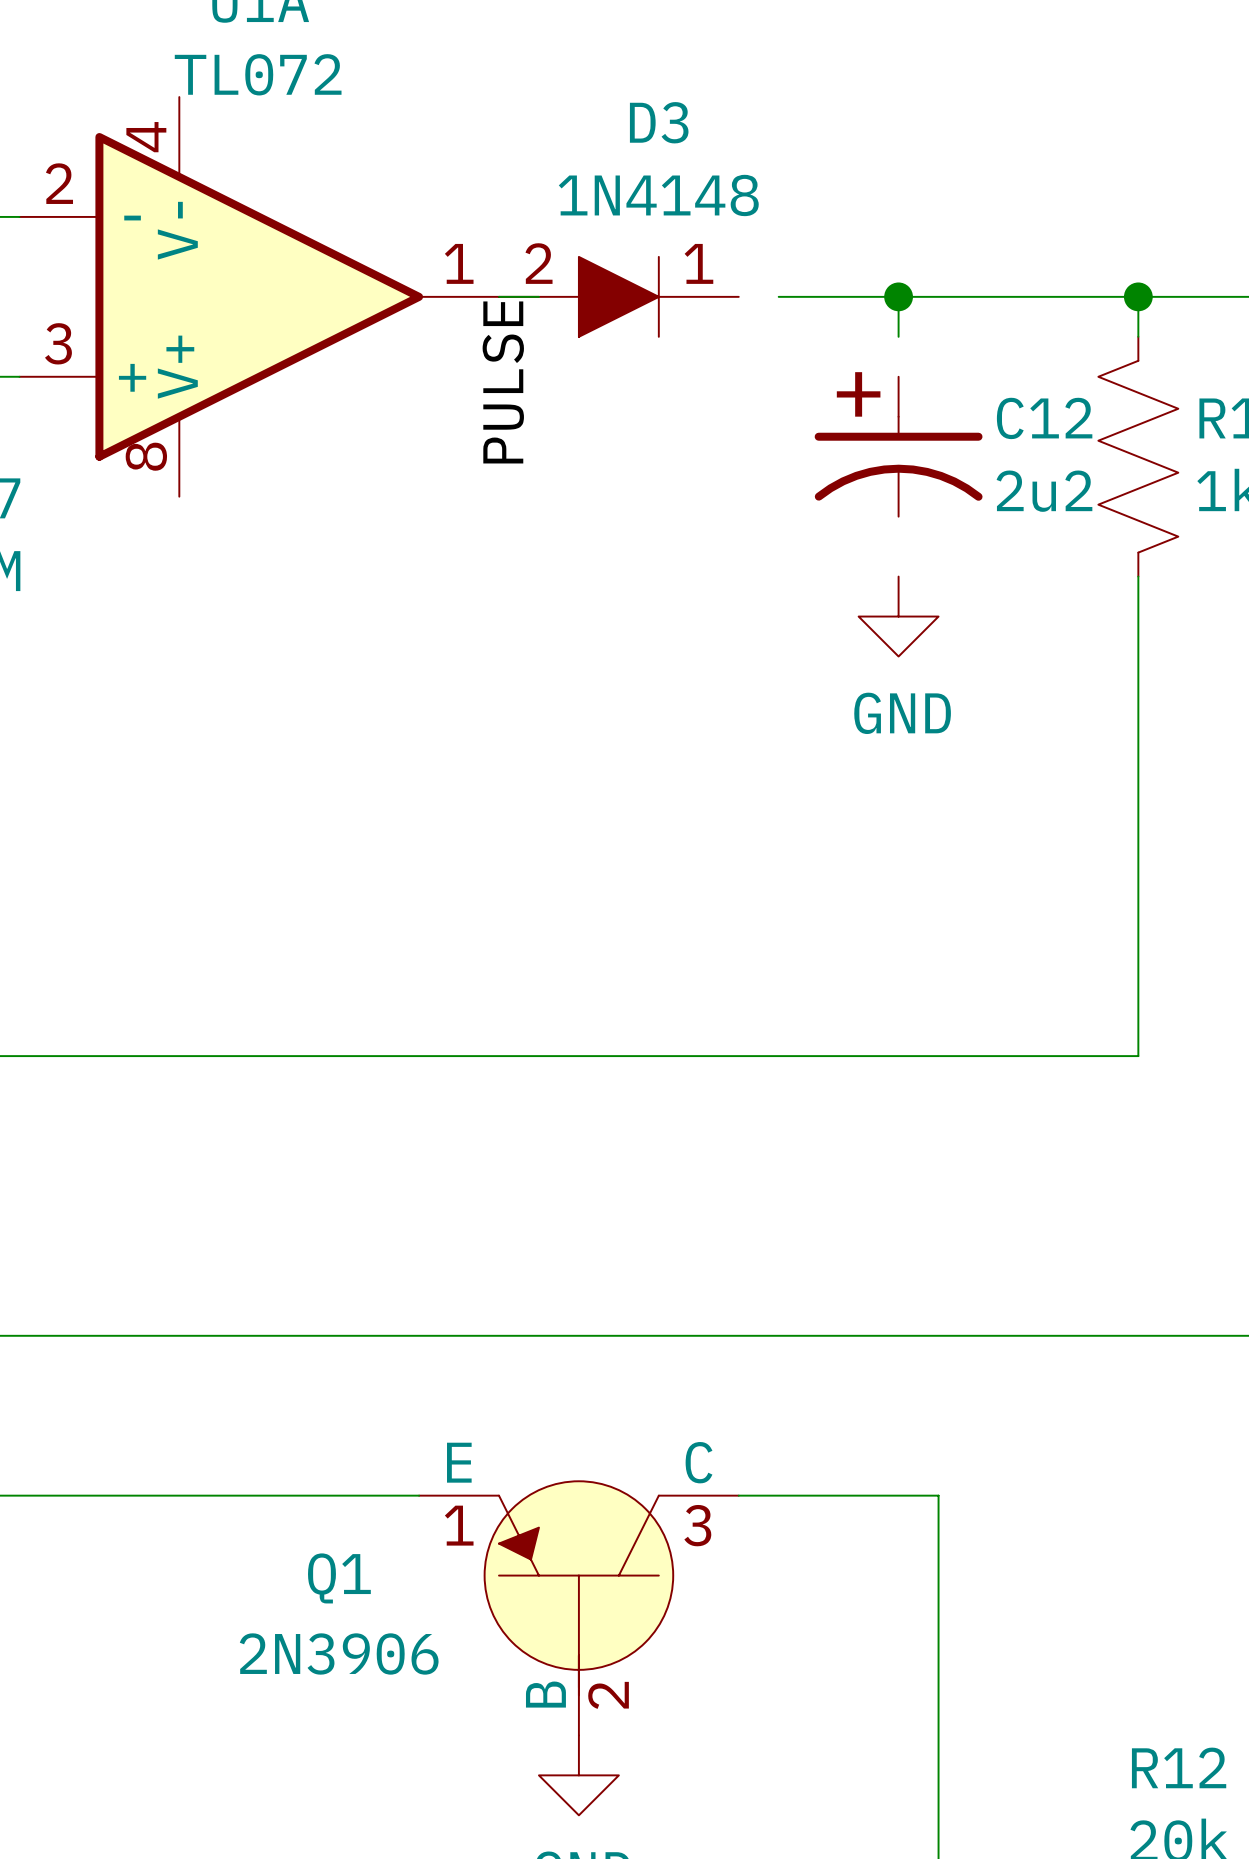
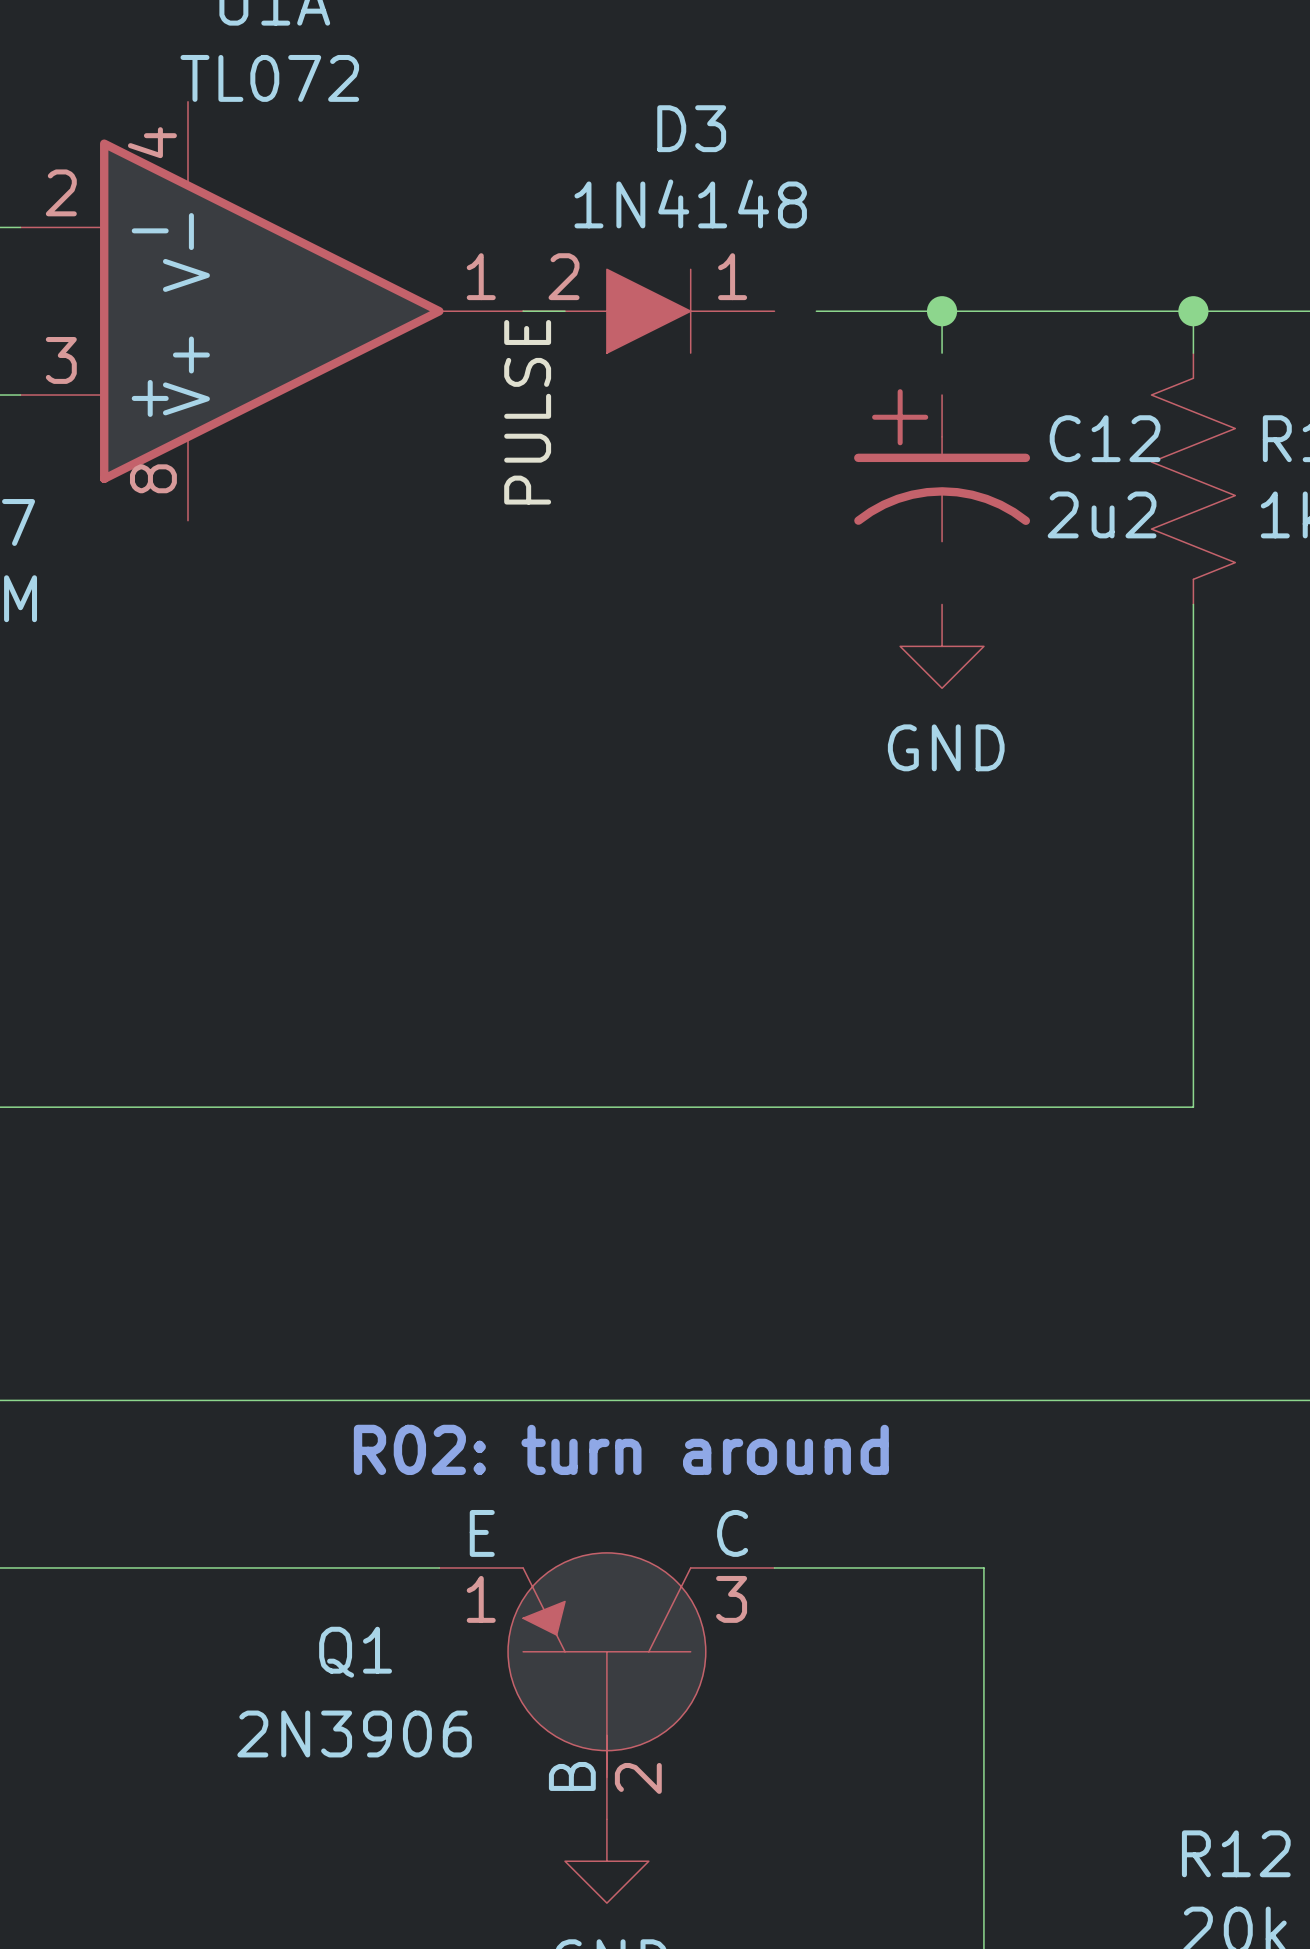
text: none -> R02: turn around (621, 1449)

